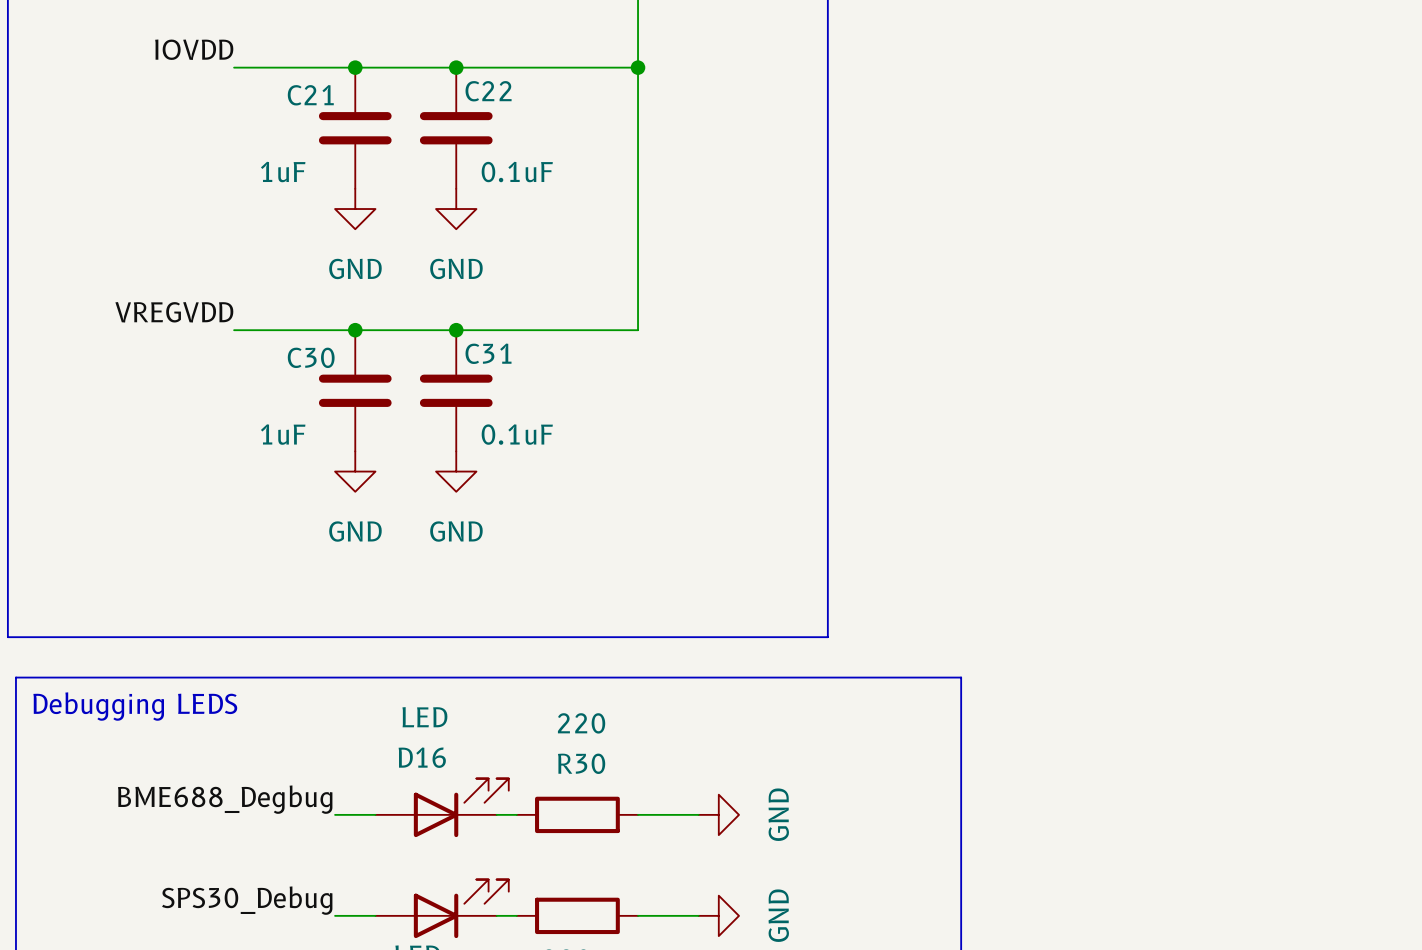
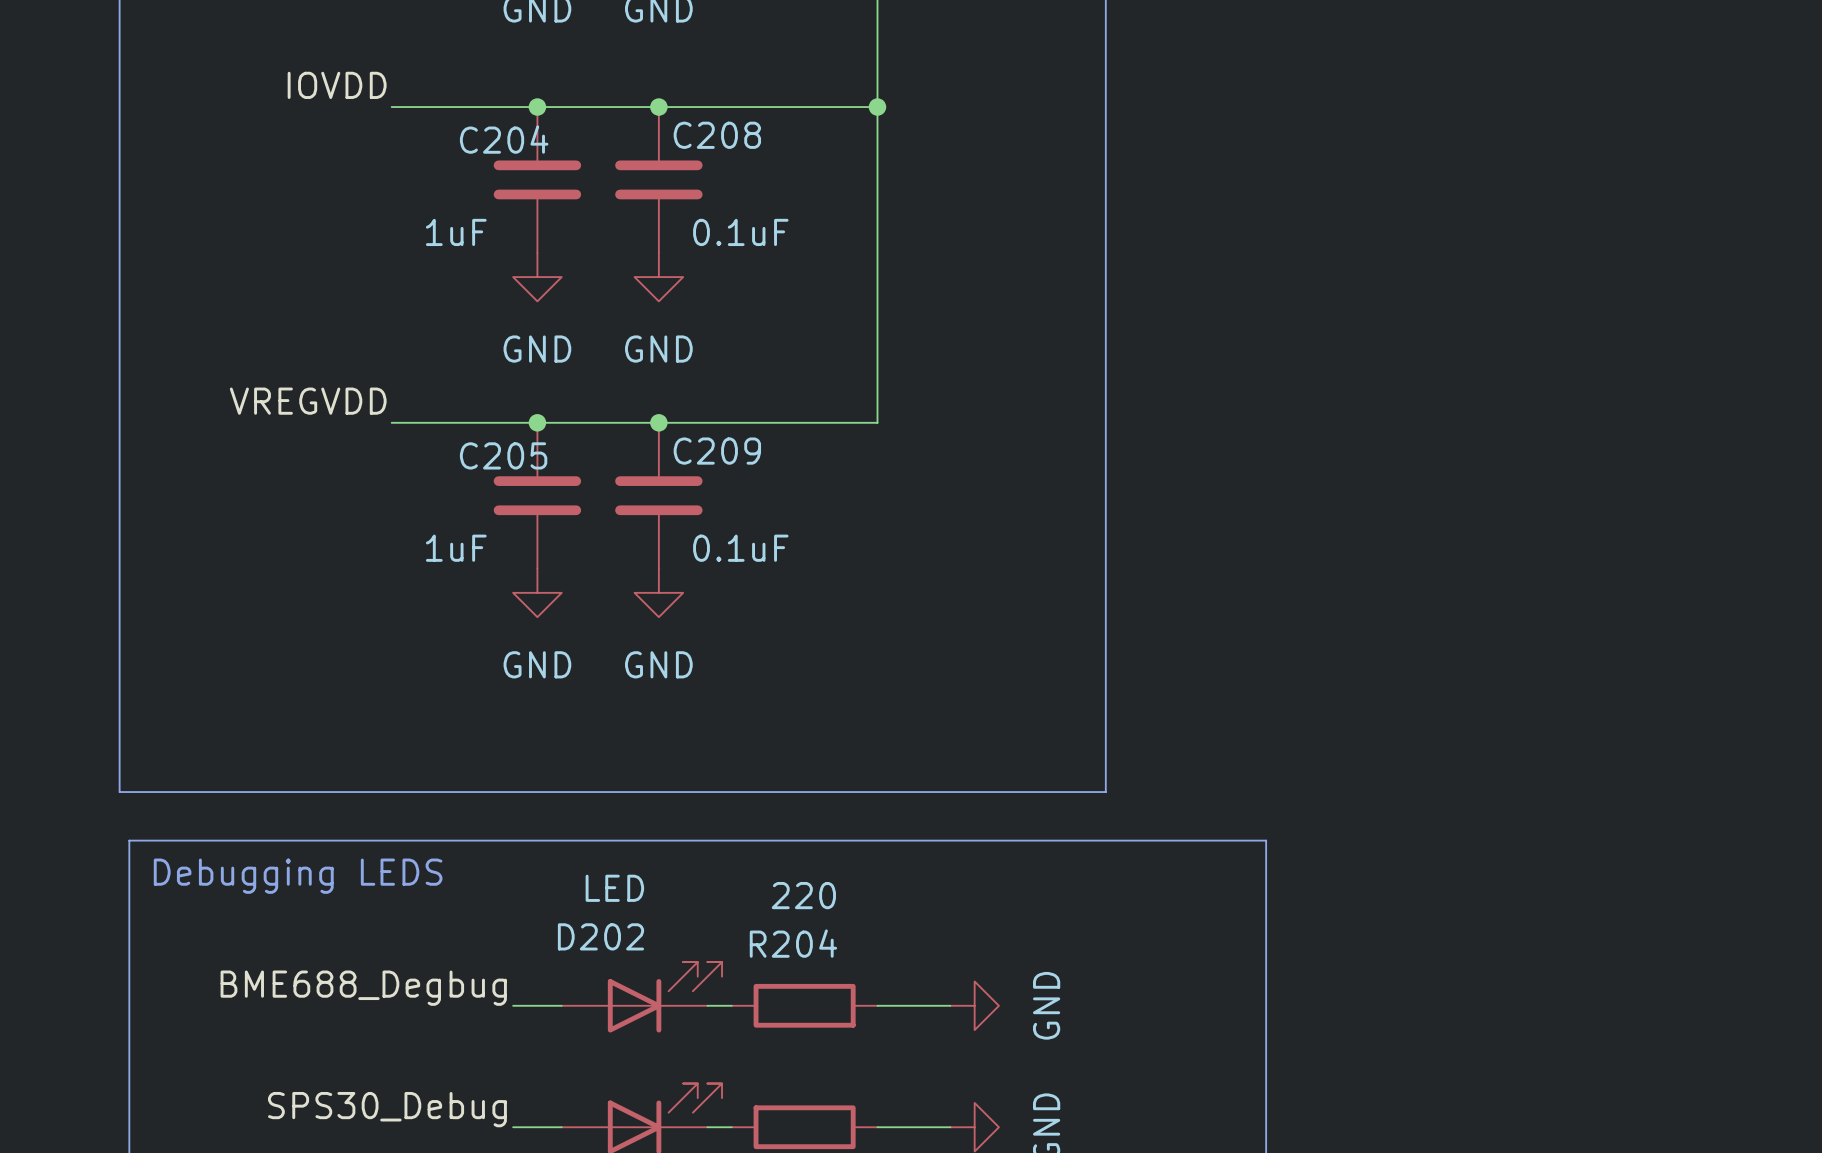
C22 name: C22 (488, 91) -> C208 (717, 135)
C21 name: C21 (310, 95) -> C204 (504, 139)
C31 name: C31 (488, 353) -> C209 (717, 451)
C30 name: C30 (311, 357) -> C205 (503, 455)
D16 name: D16 (422, 757) -> D202 (600, 936)
R30 name: R30 (581, 763) -> R204 (793, 943)

